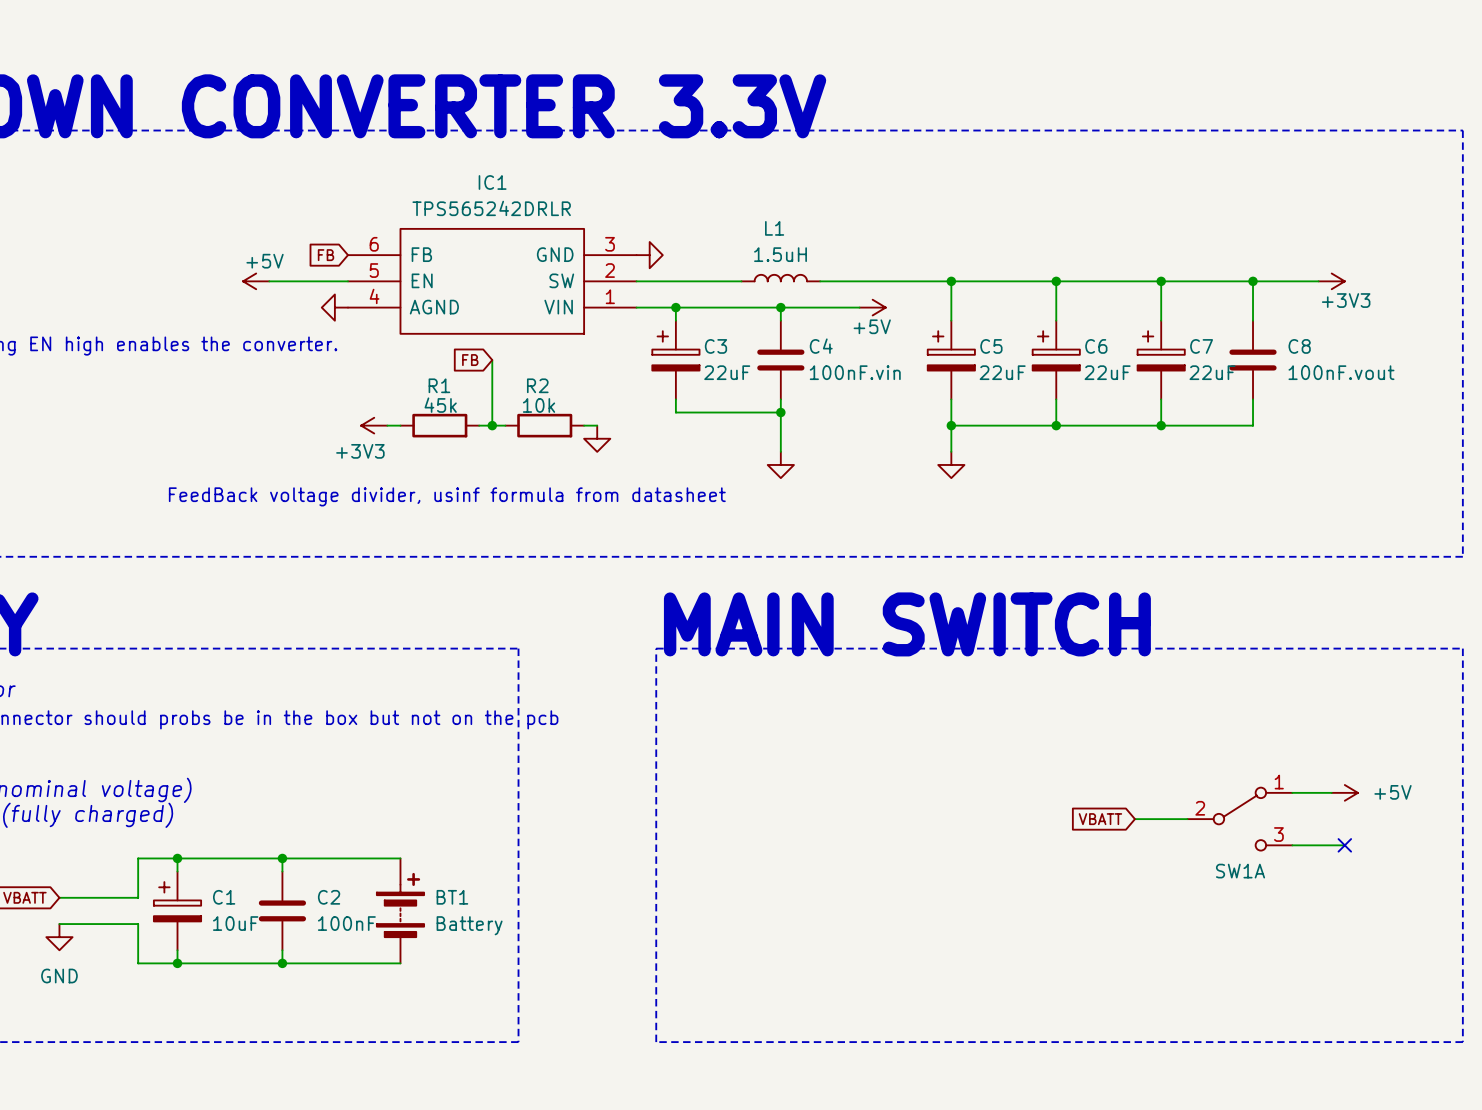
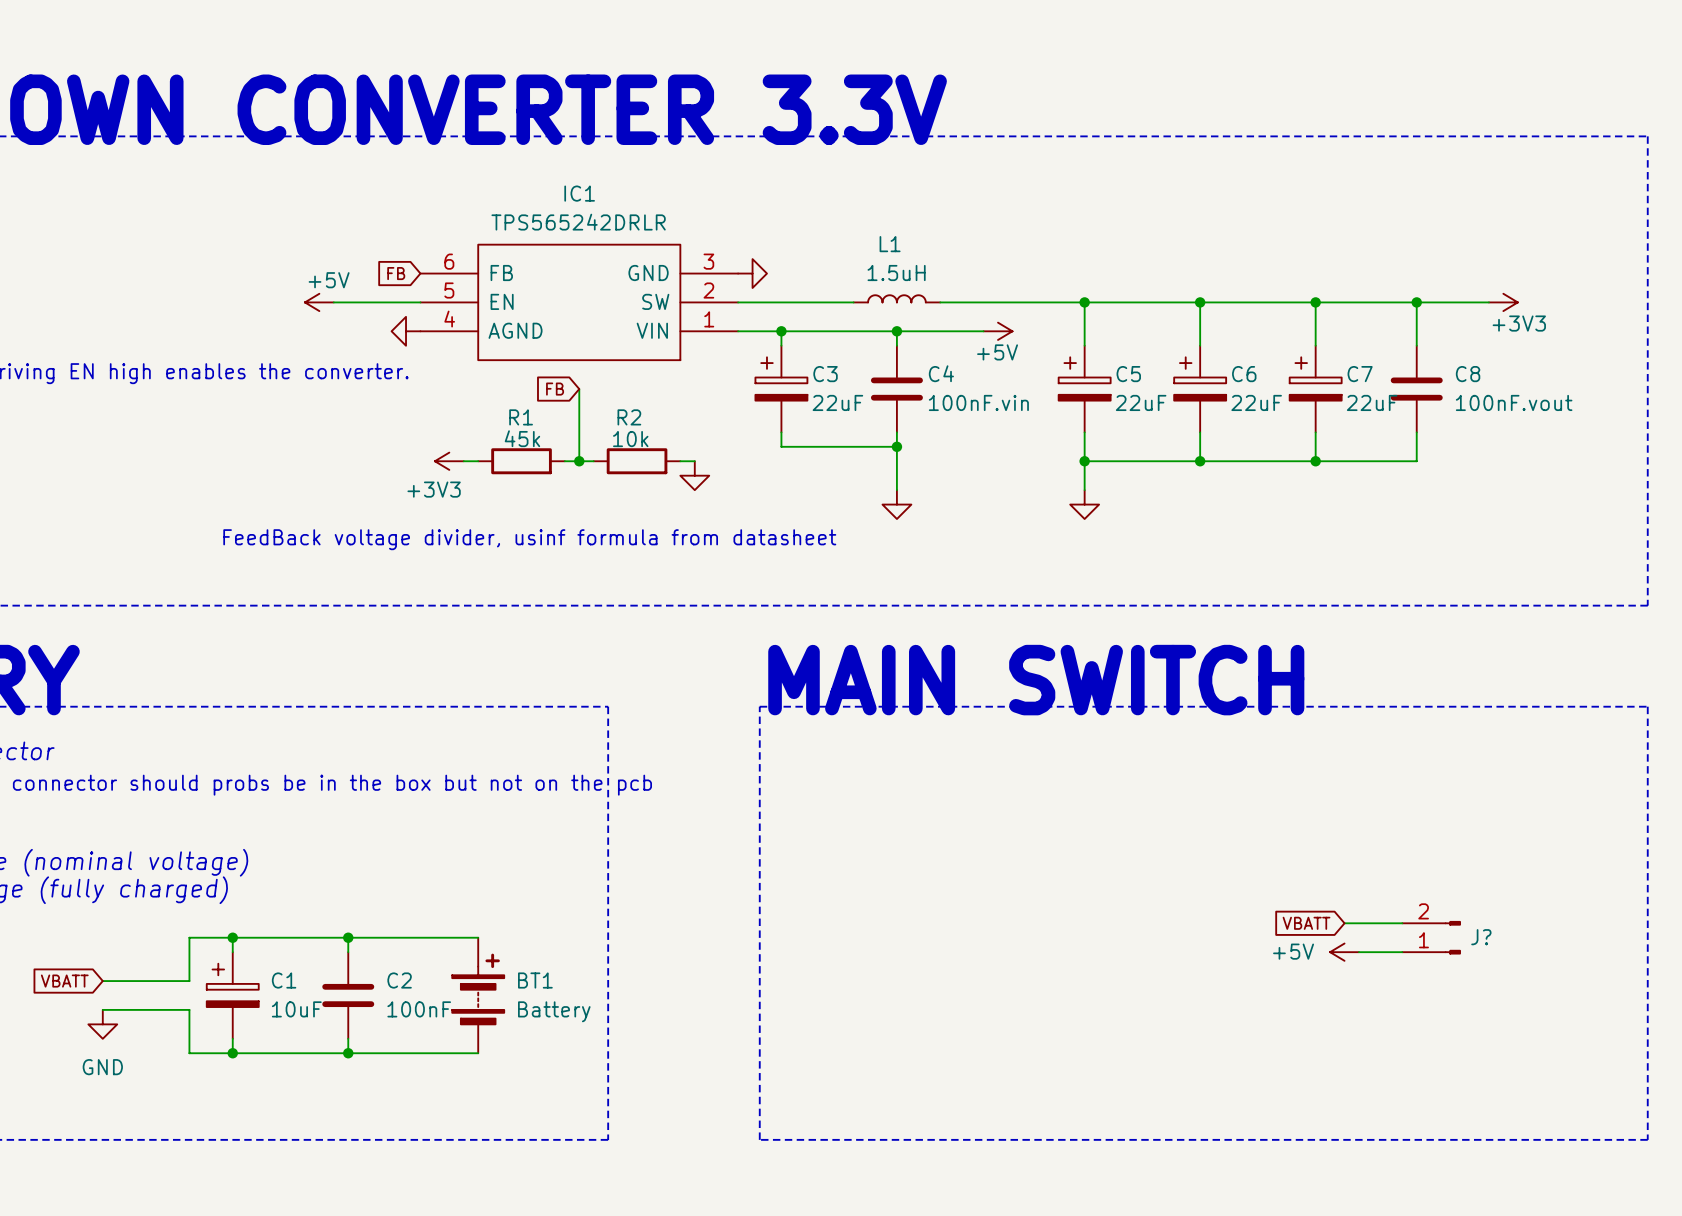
wire: (1292, 792) (1331, 792) -> (1358, 952) (1402, 952)
power symbol rotation: 0° (1344, 792) -> 180° (1344, 952)
power symbol position: +5V (1344, 792) -> +5V (1344, 952)
global label position: VBATT (1100, 819) -> VBATT (1306, 923)
wire: (1134, 819) (1187, 819) -> (1344, 923) (1402, 923)
SW1A: (1239, 819) -> none
wire: (1292, 845) (1344, 845) -> none
no-connect mark: (1344, 845) -> none
J?: none -> (1431, 937)

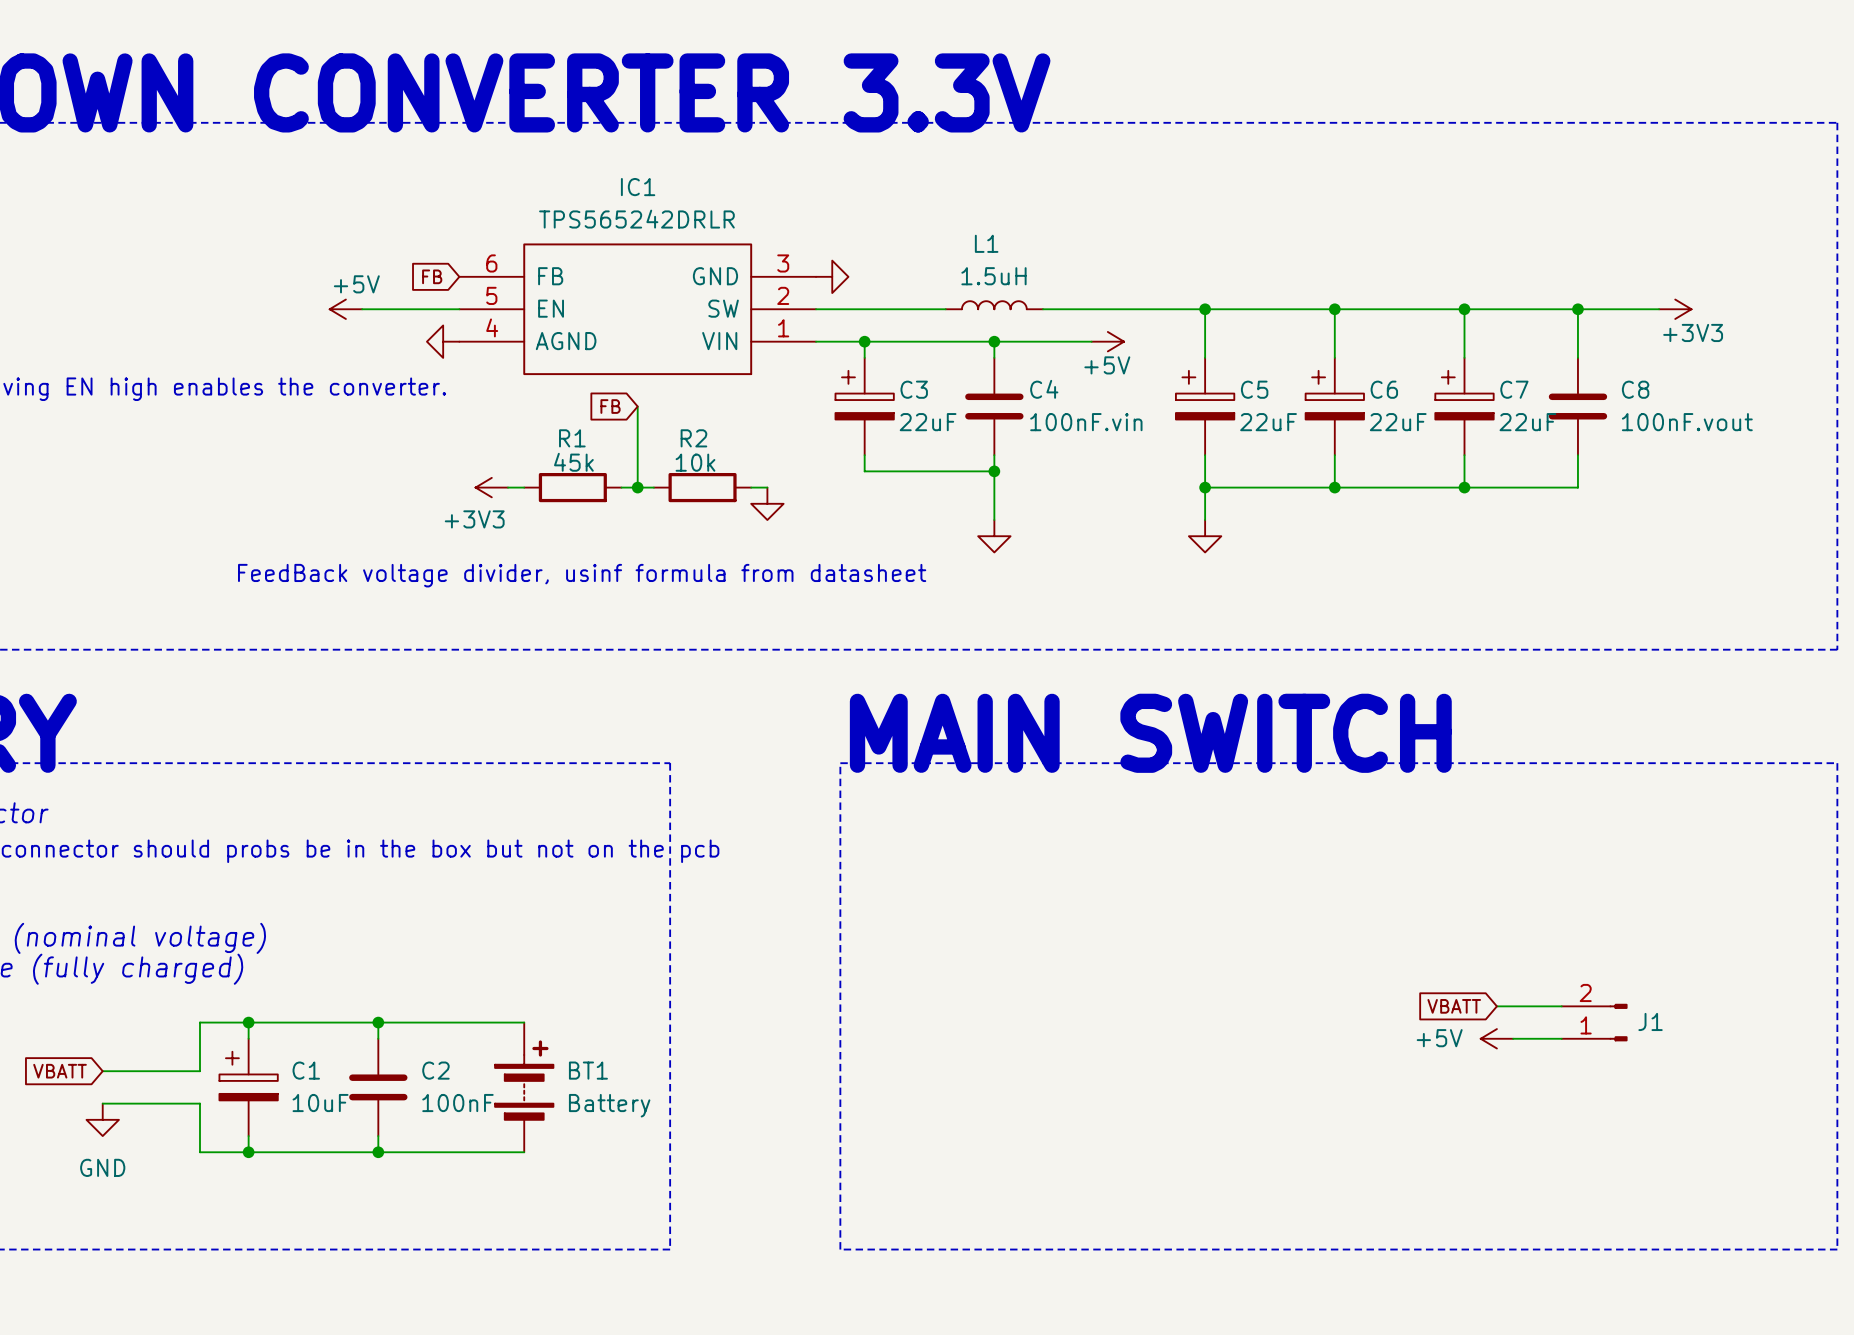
J? name: J? (1481, 937) -> J1 (1650, 1021)

